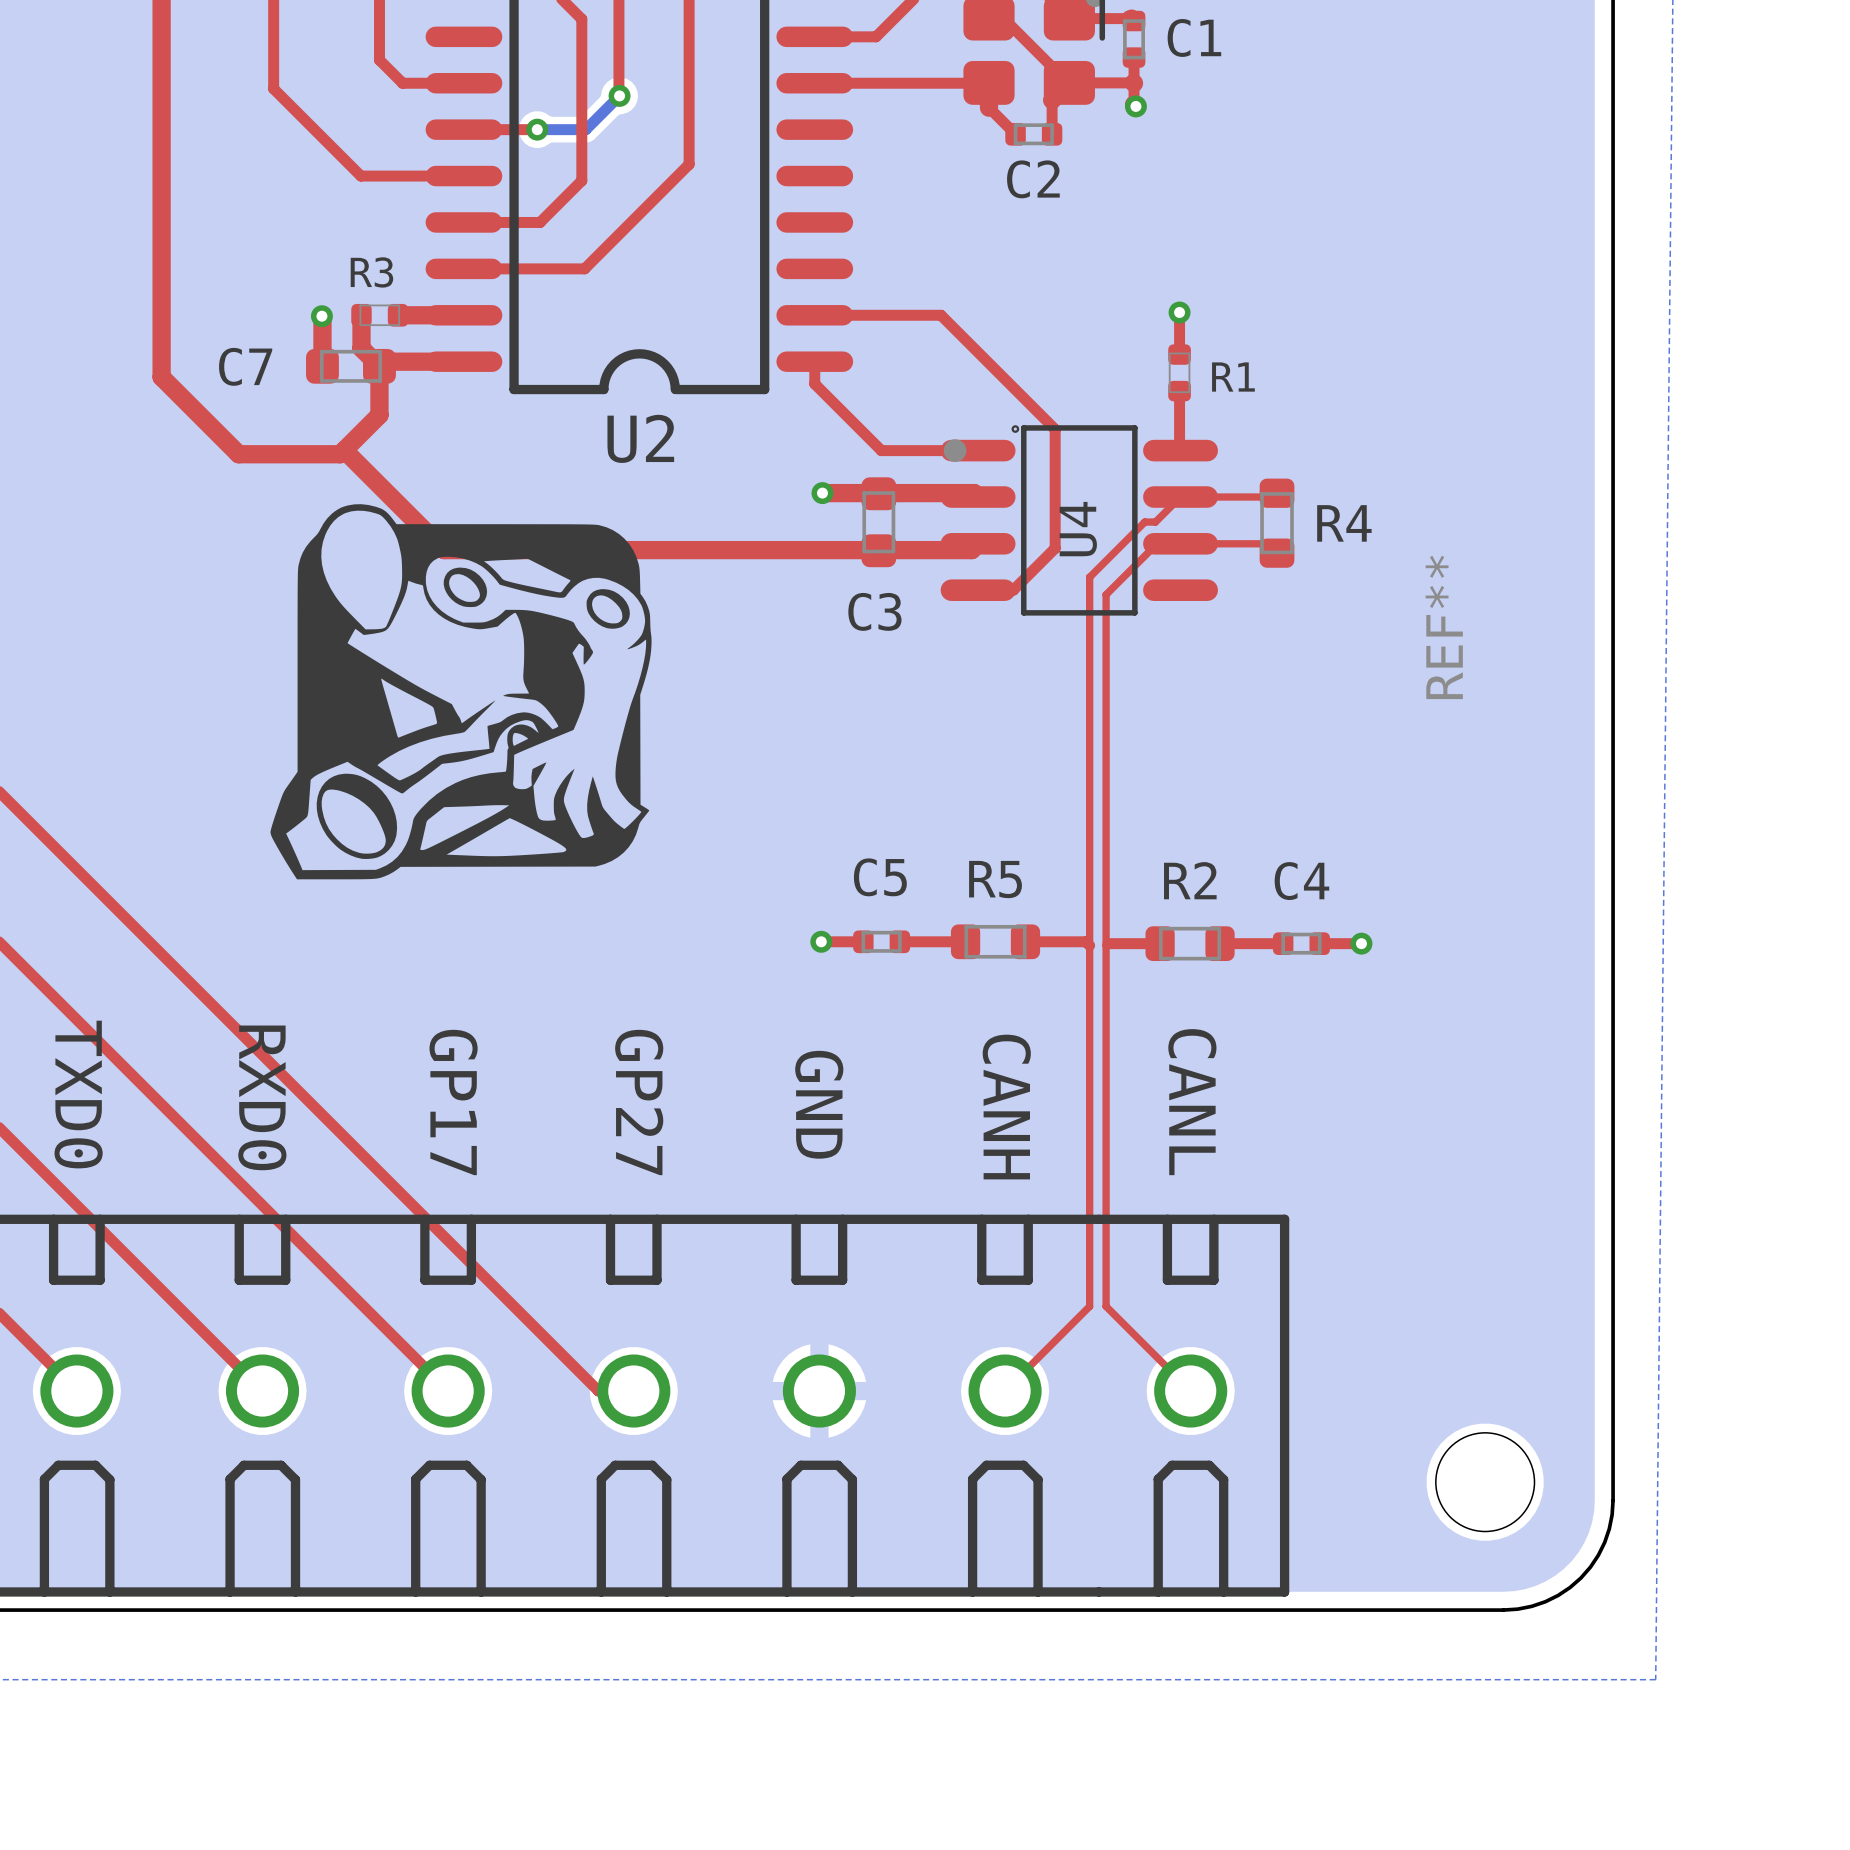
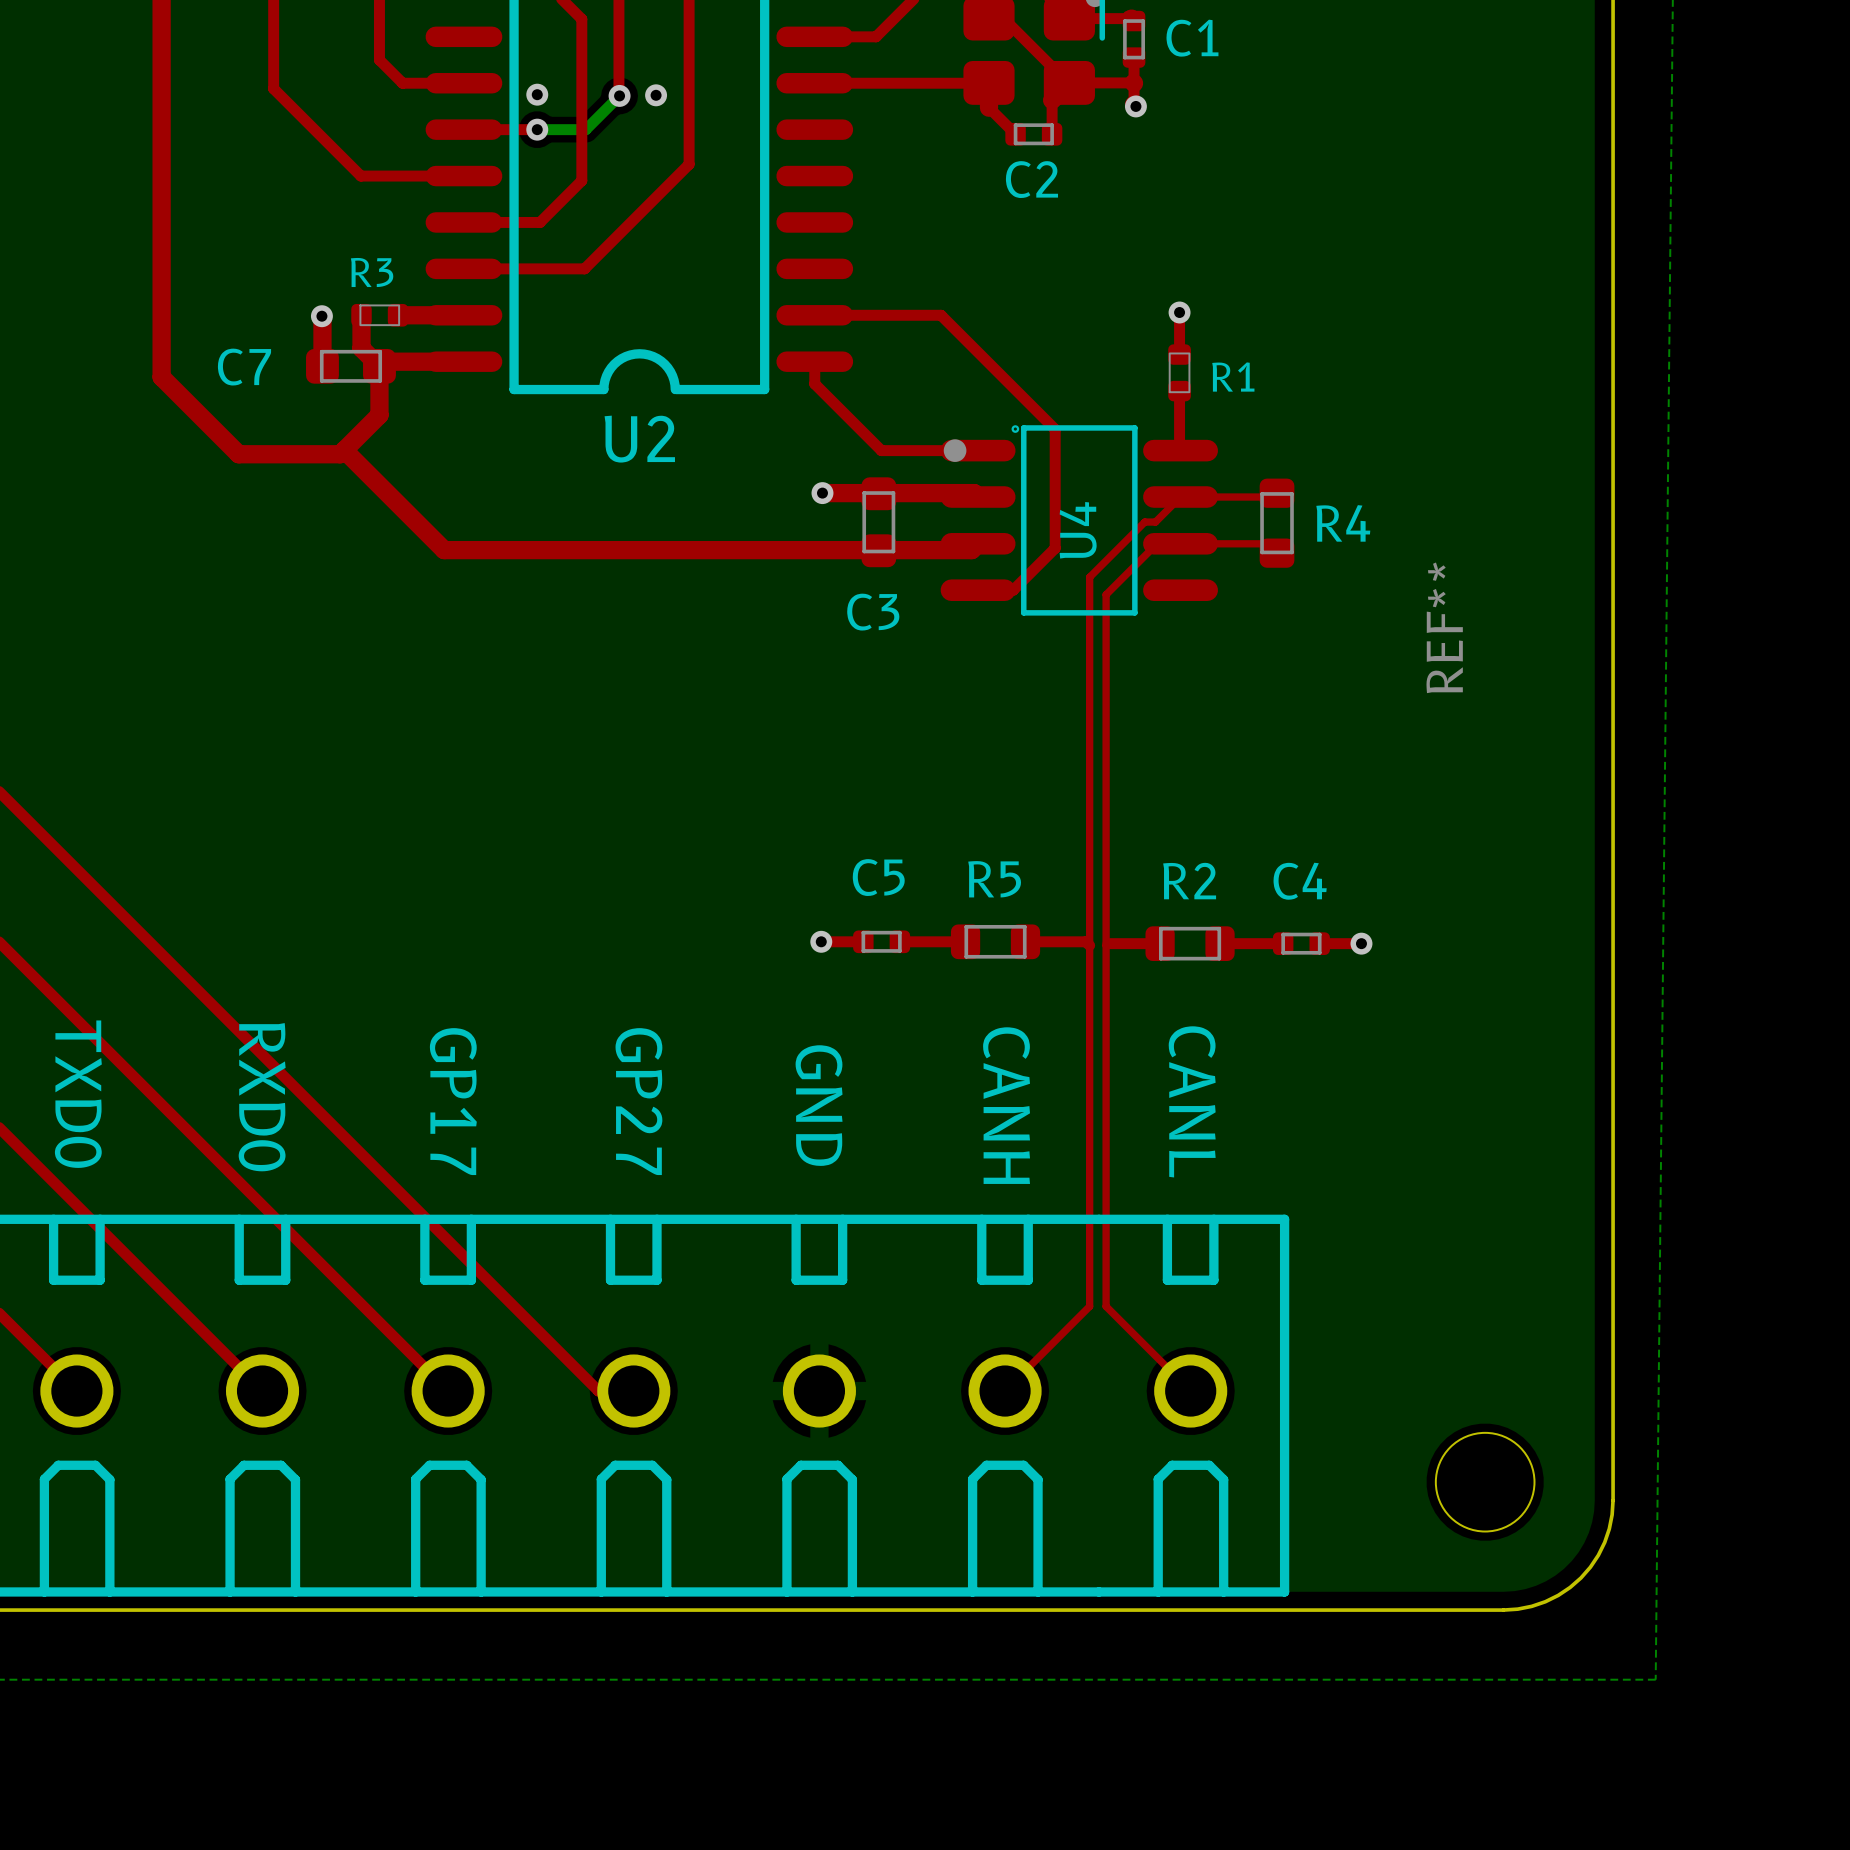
via: none -> (537, 94)
via: none -> (656, 95)
drawing: [270, 504, 652, 880] -> none

